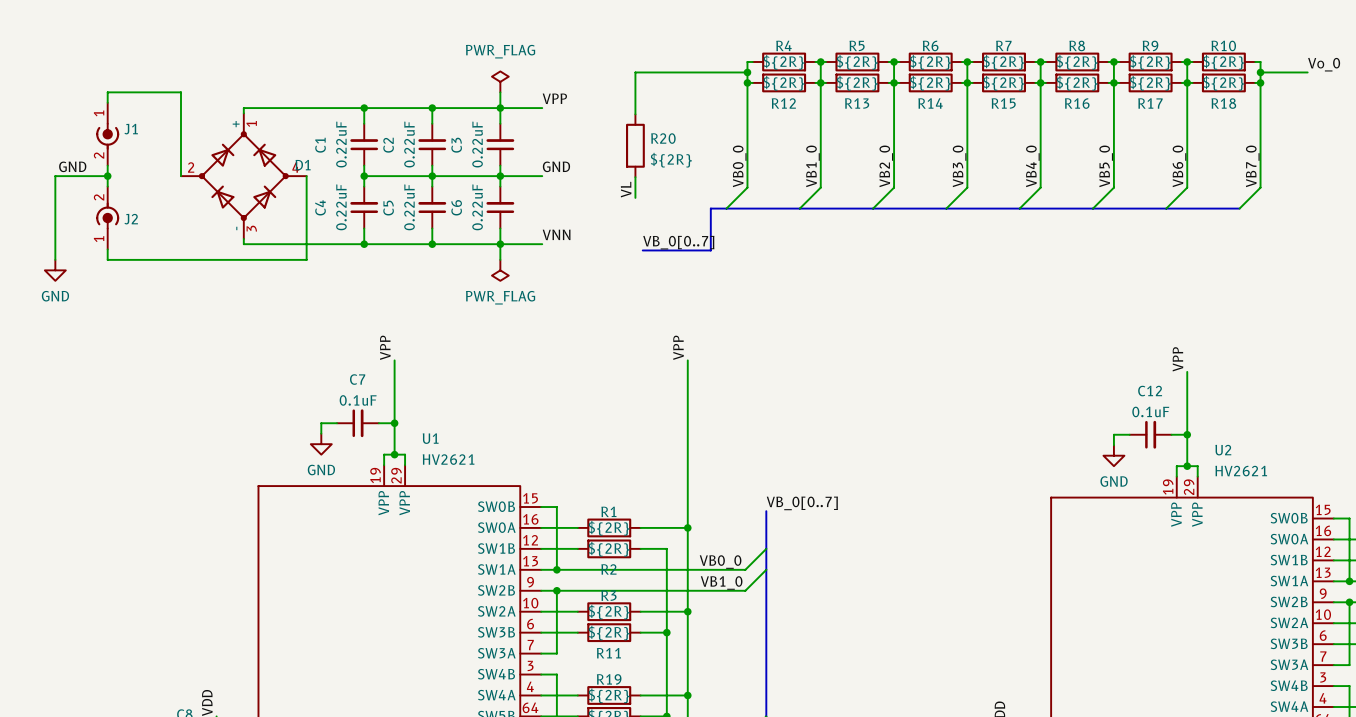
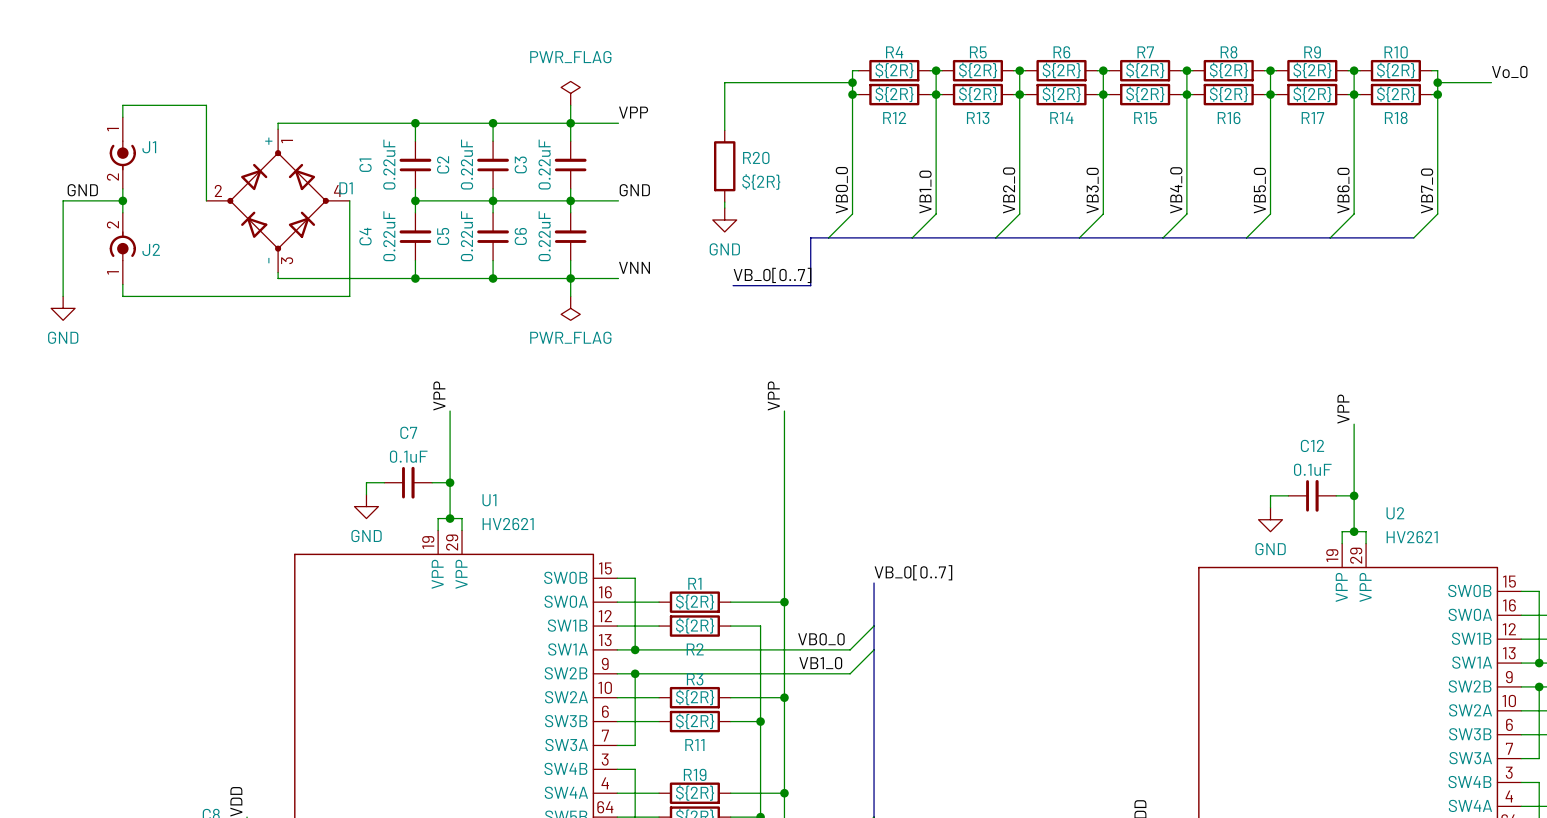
label: VL (626, 189) -> none
power symbol: none -> GND (724, 219)

